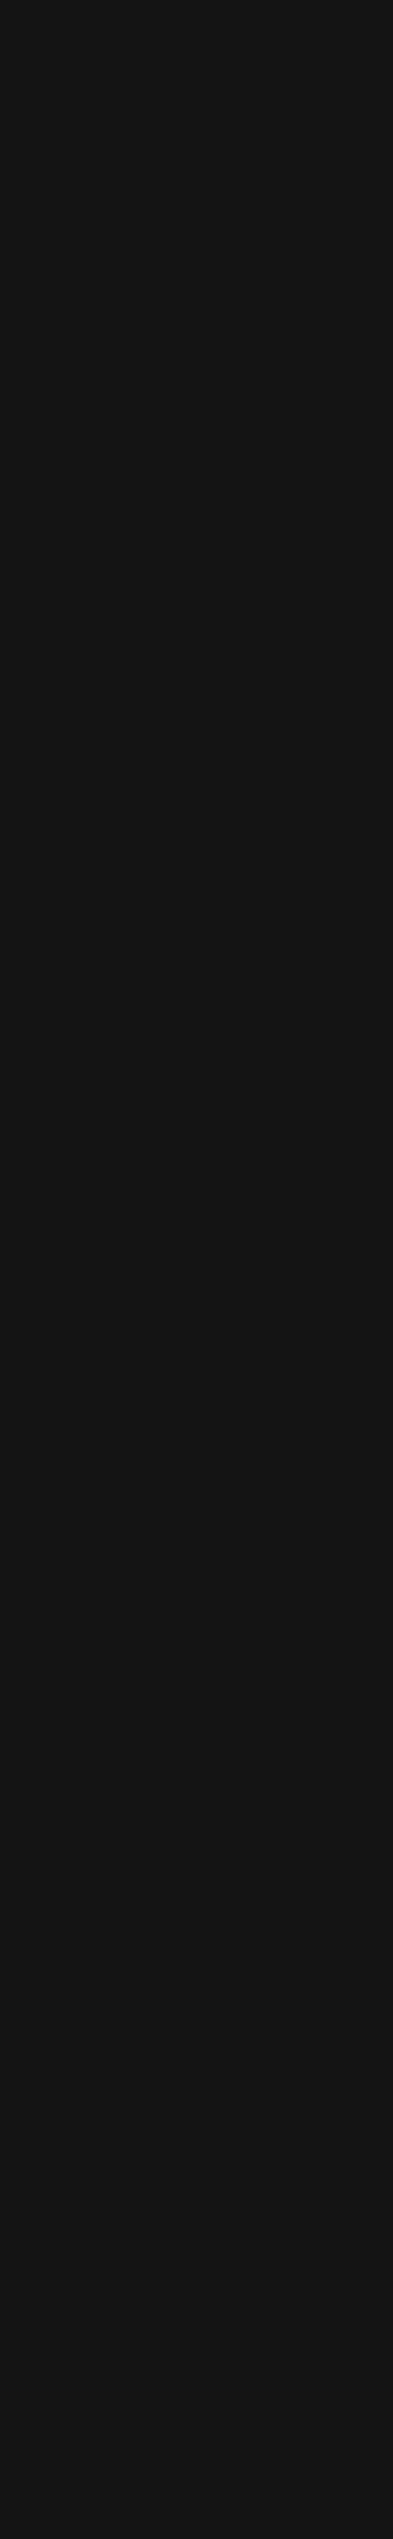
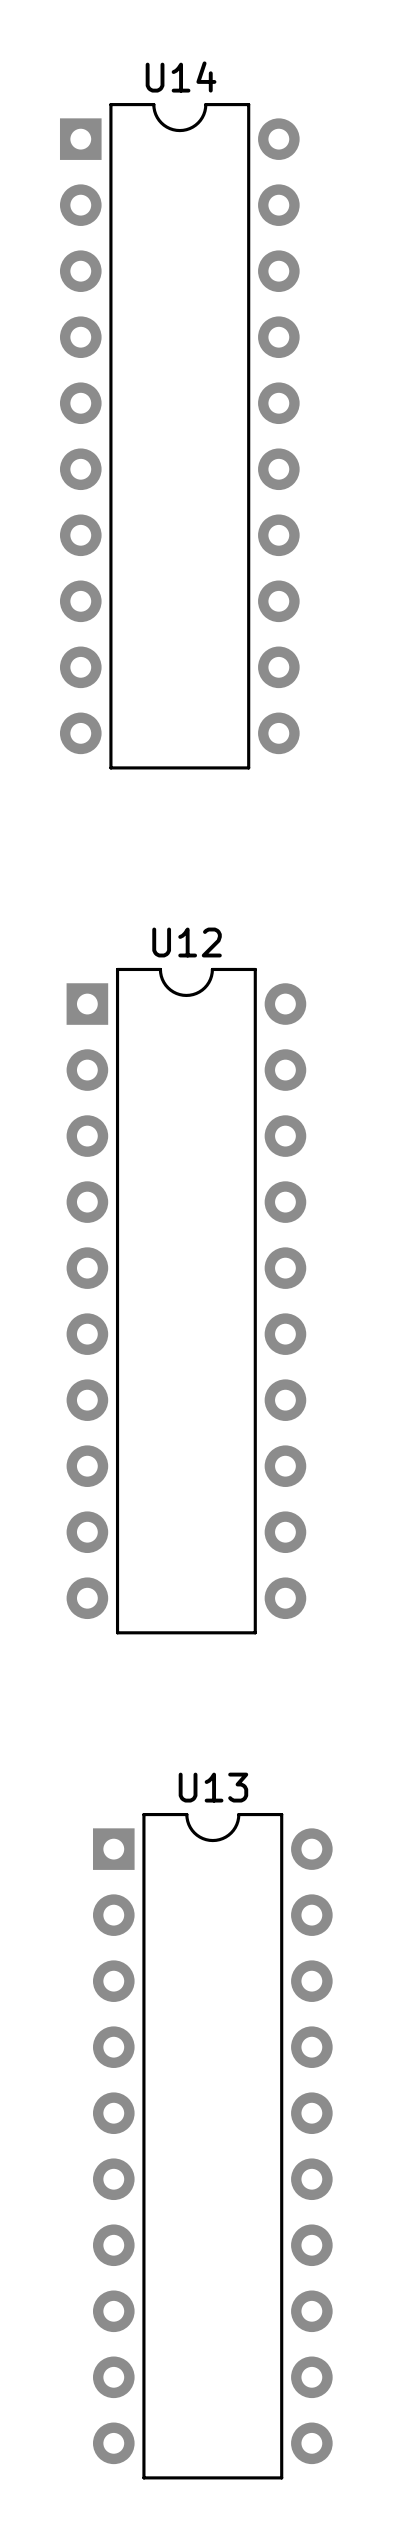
U14: none -> (179, 436)
U12: none -> (186, 1301)
U13: none -> (212, 2146)

